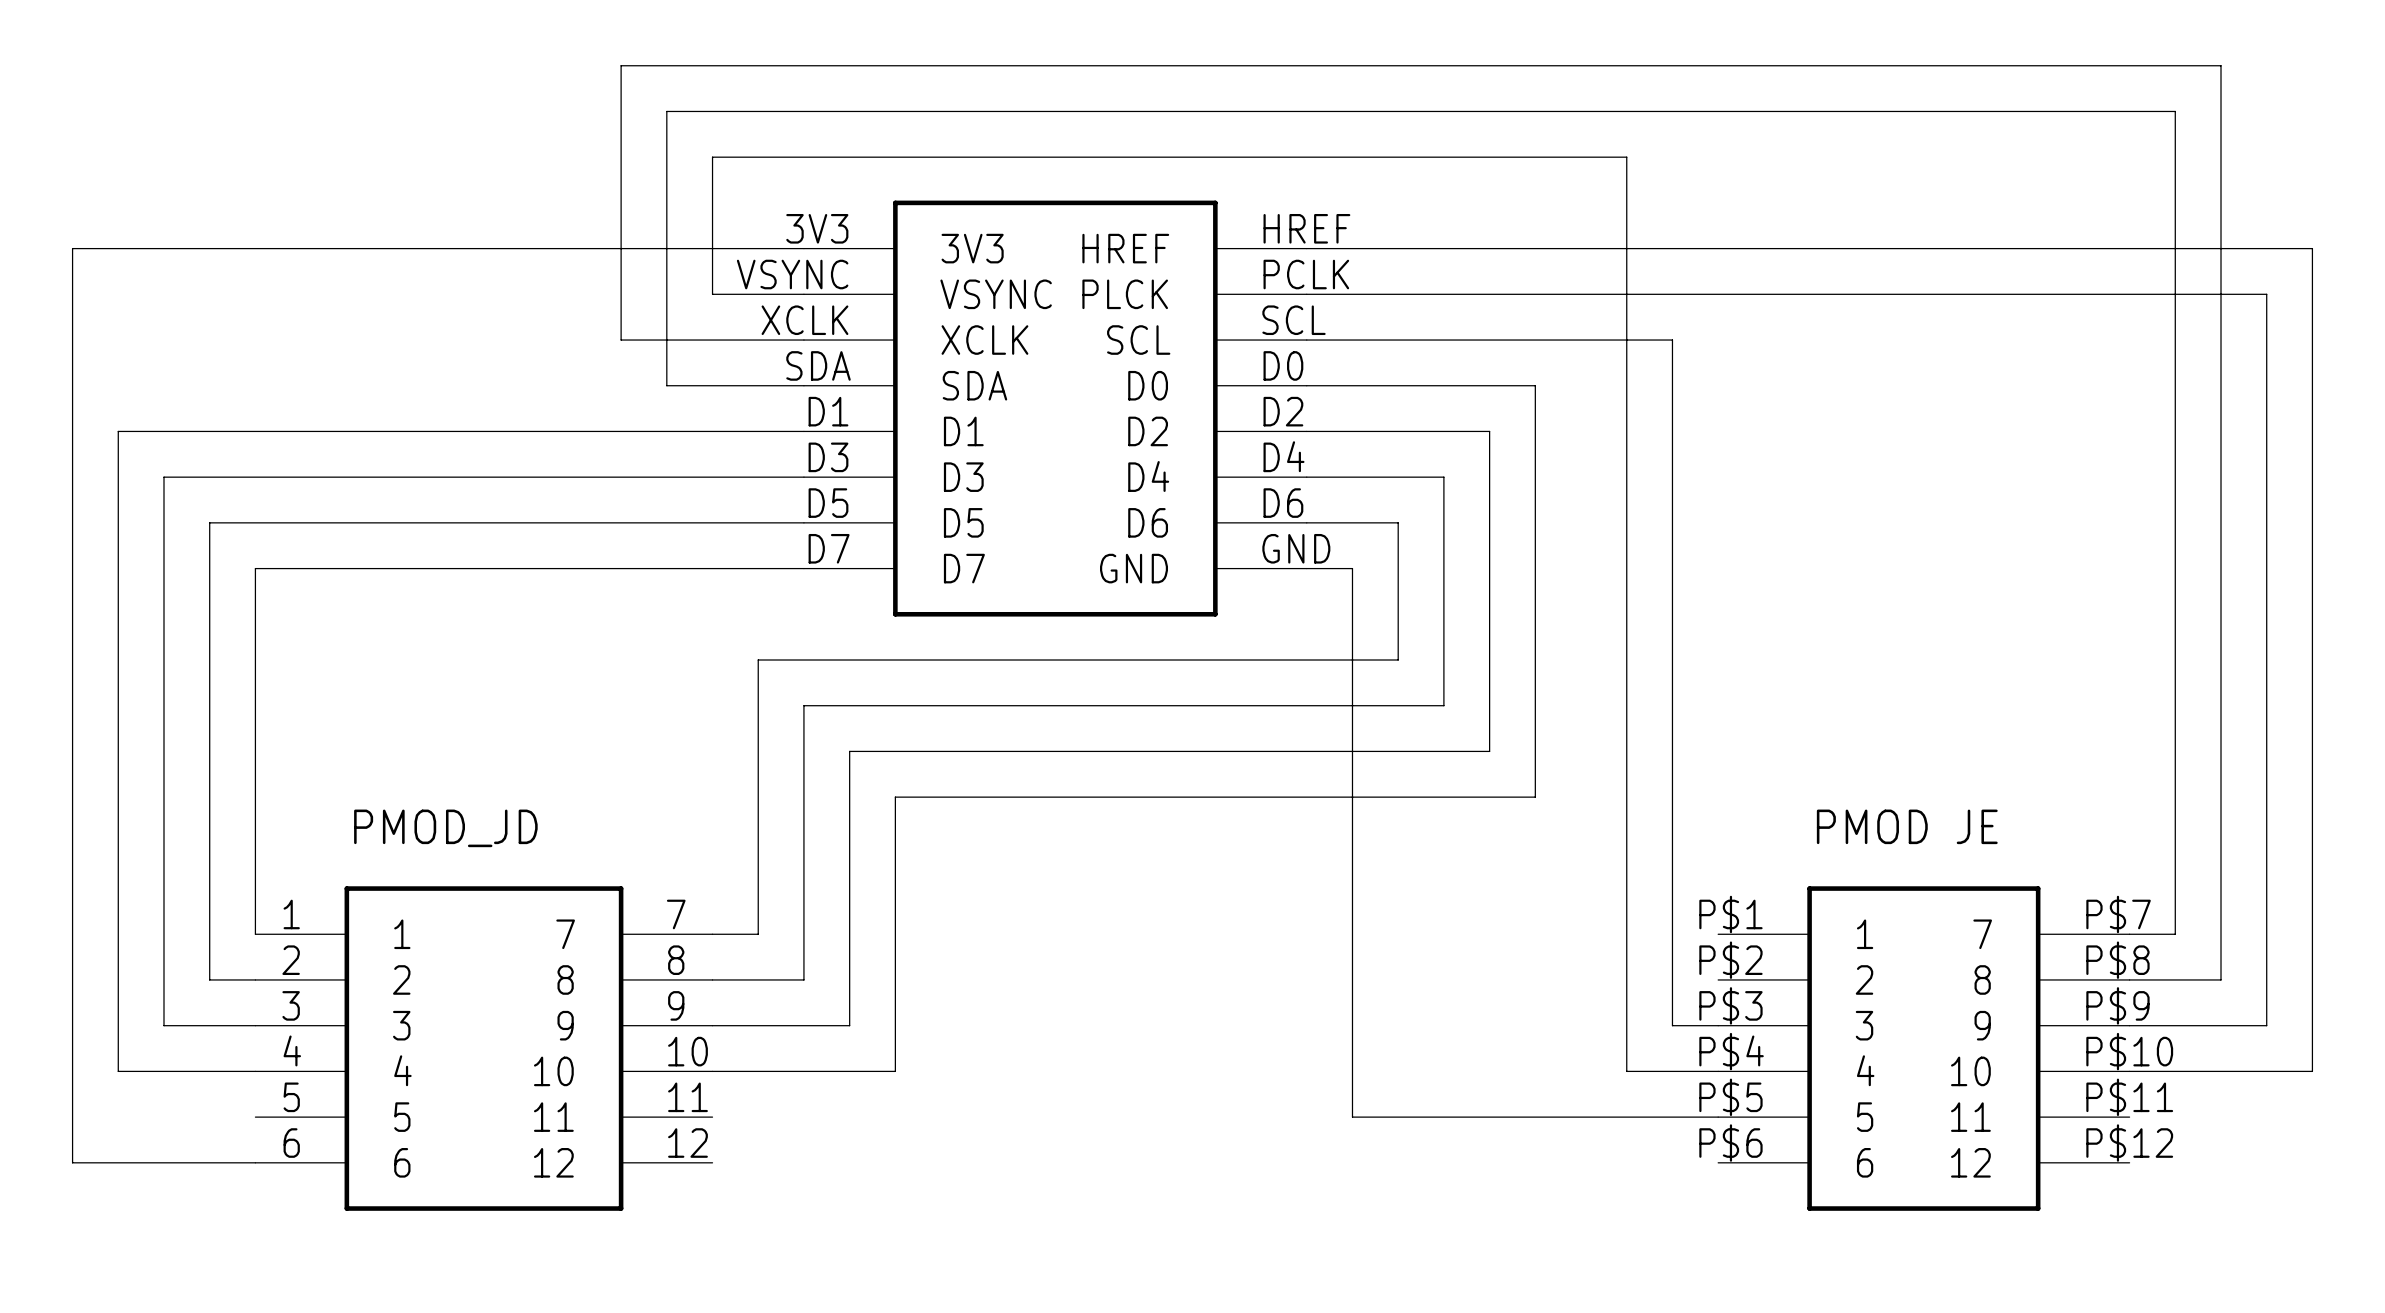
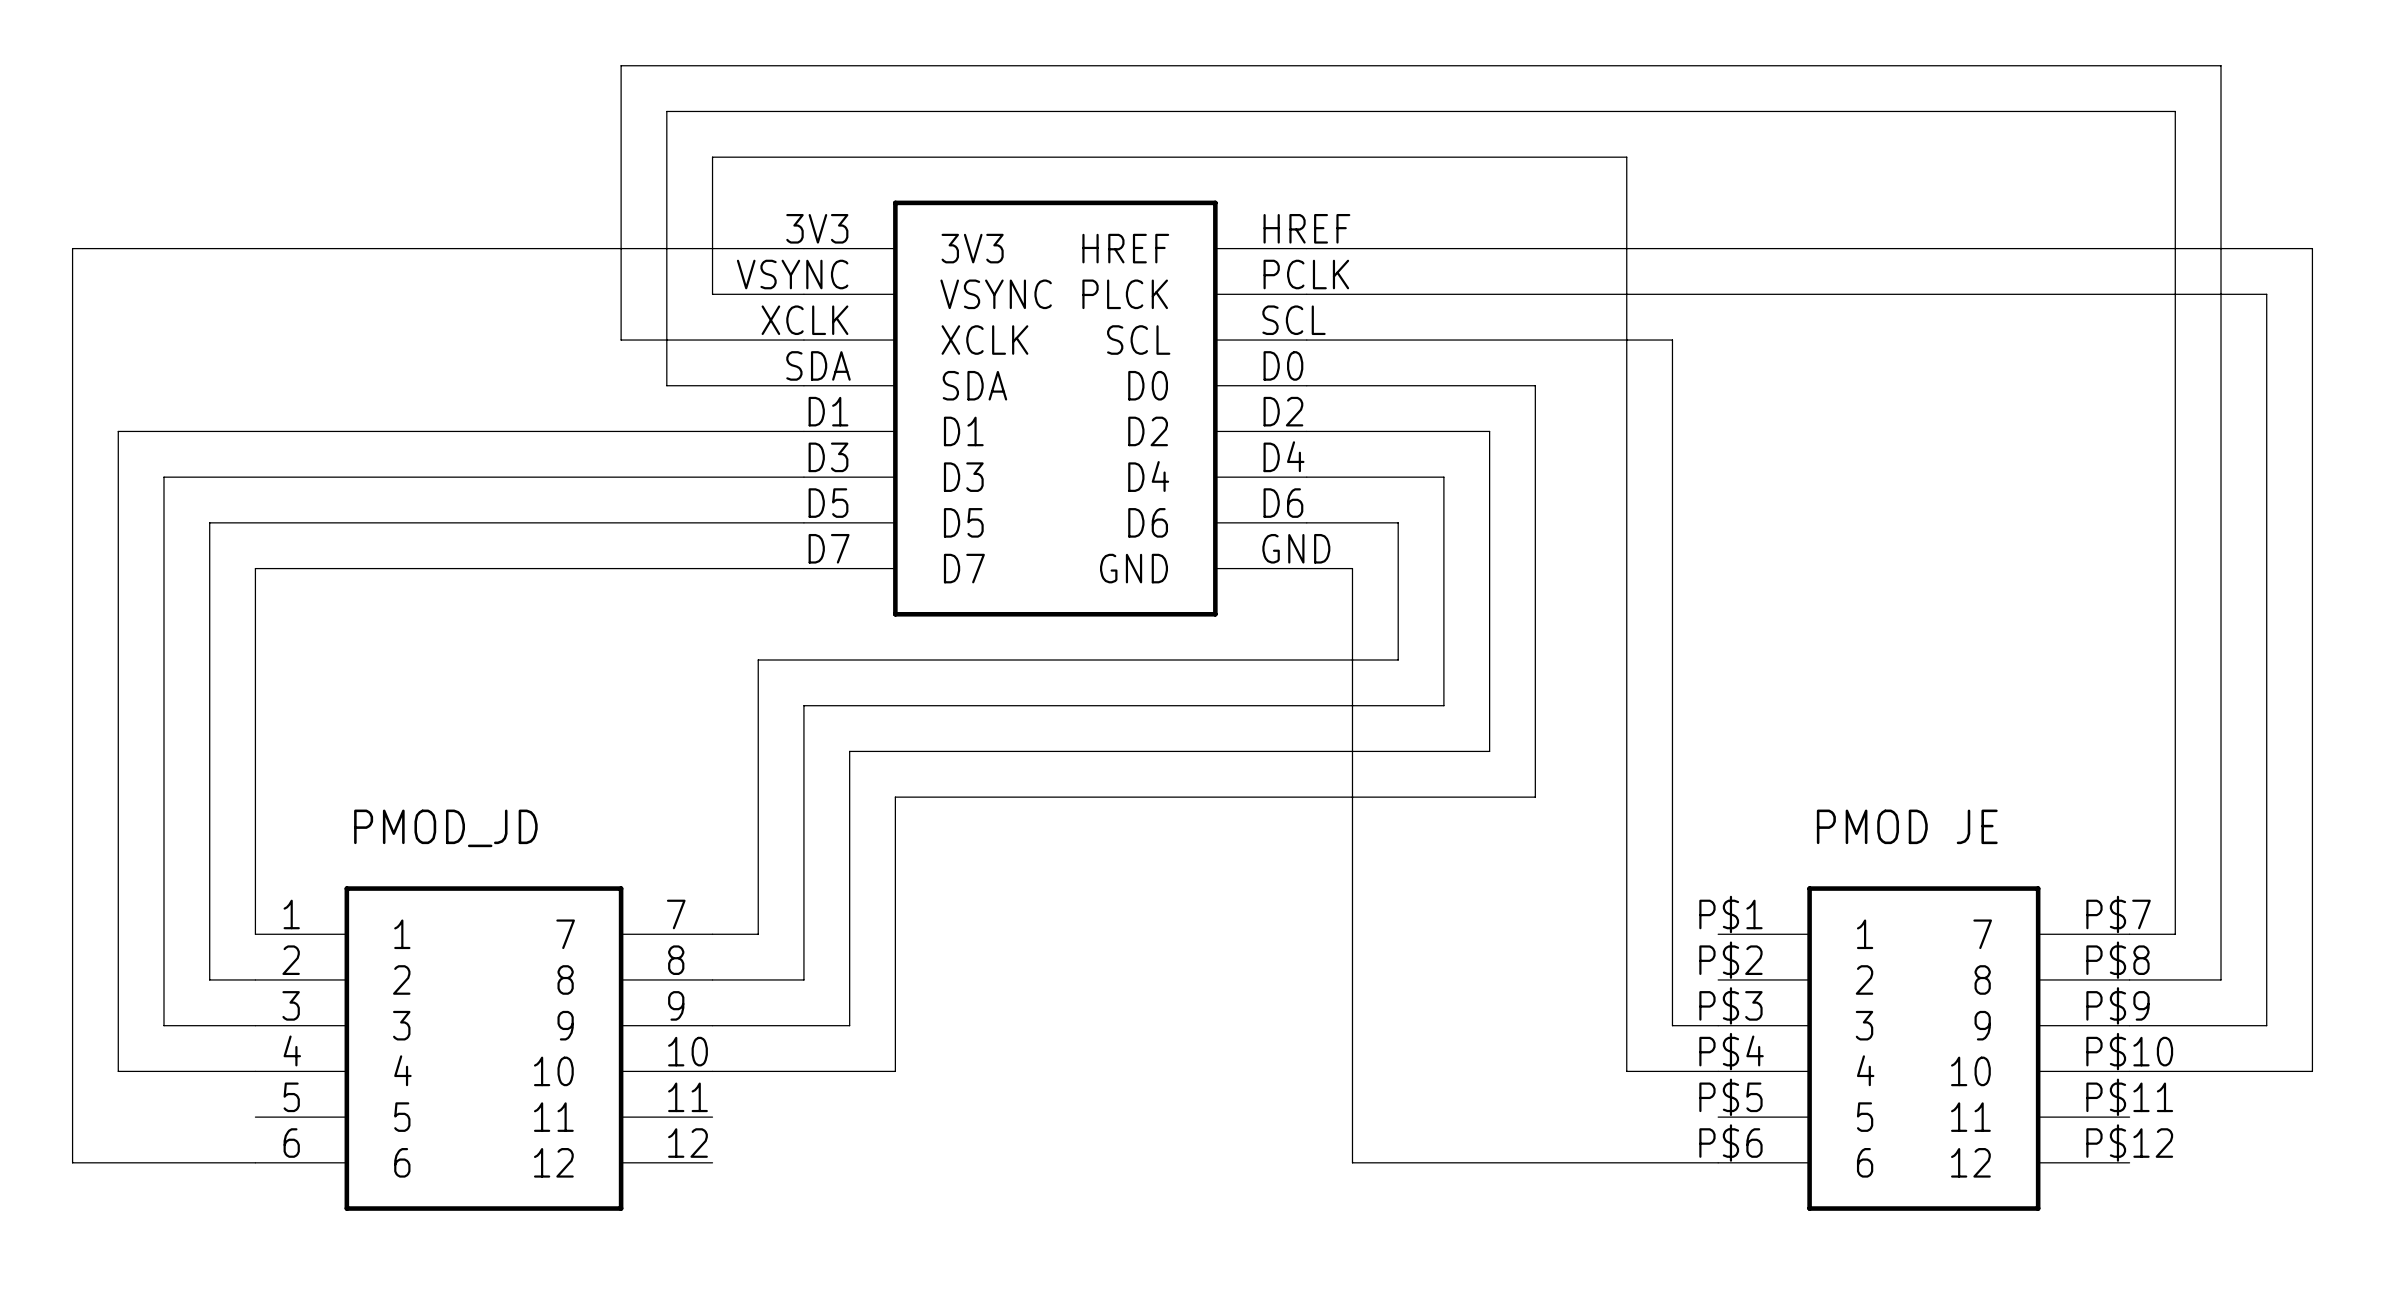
wire: (1352, 1117) (1718, 1117) -> (1352, 1117) (1352, 1162) (1718, 1162)

